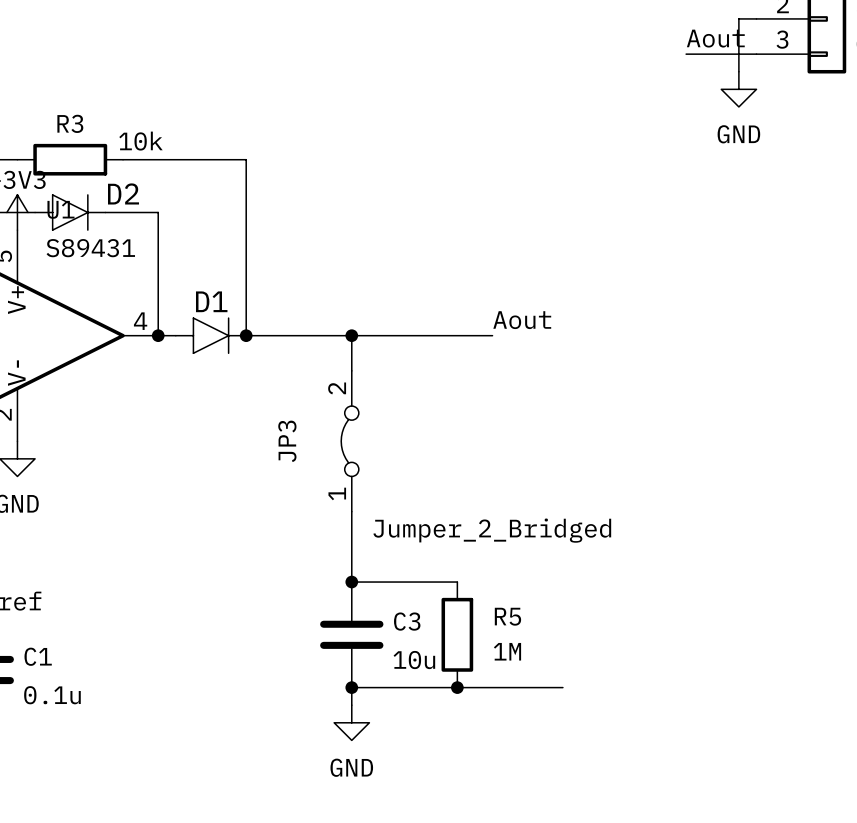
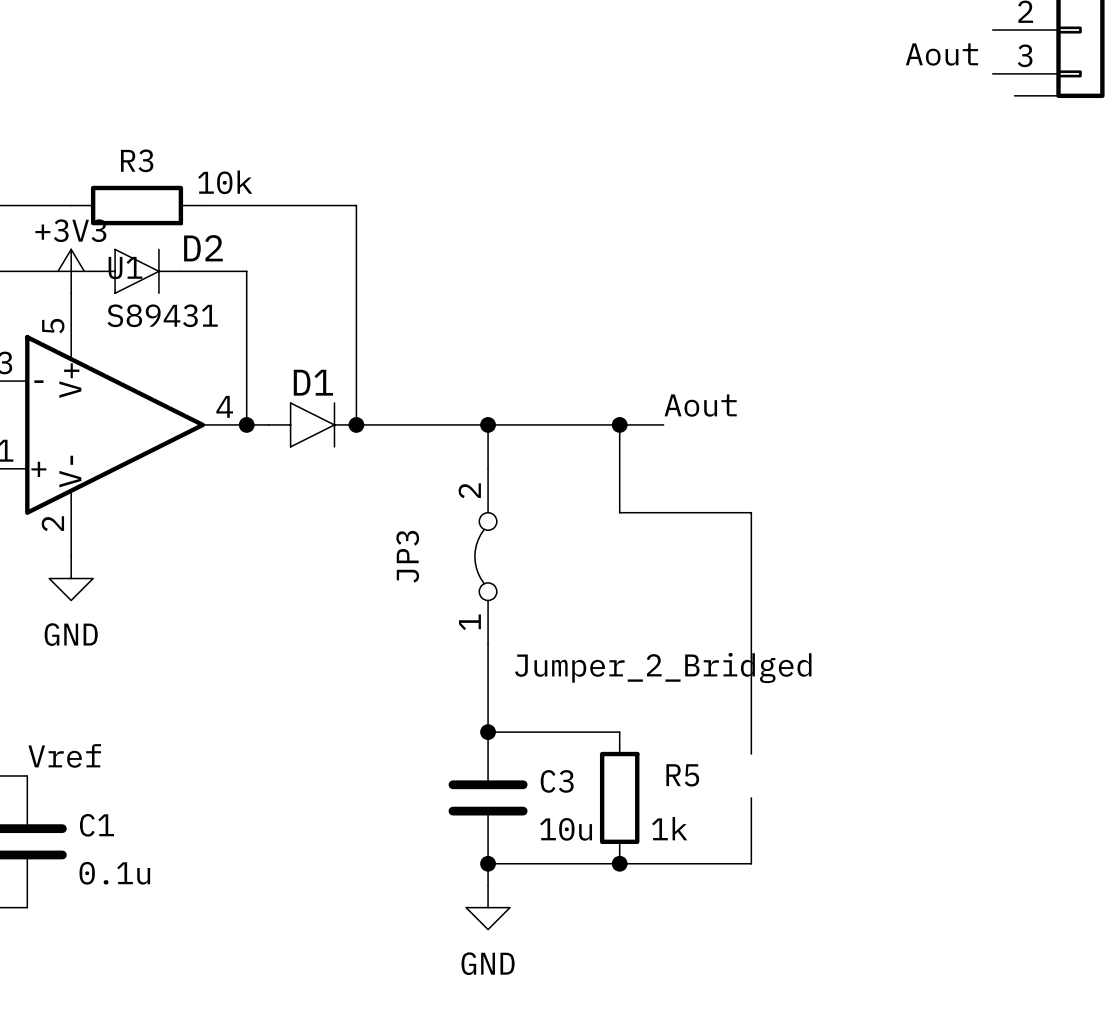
wire: (756, 18) (738, 18) (738, 71) -> none
wire: (686, 54) (756, 54) -> none
wire: none -> (1014, 95) (1058, 95)
power symbol: GND (738, 89) -> none
wire: none -> (619, 424) (619, 512) (751, 512) (751, 754)
junction: none -> (619, 424)
wire: none -> (751, 797) (751, 863)
R5 value: 1M (507, 651) -> 1k (669, 828)

